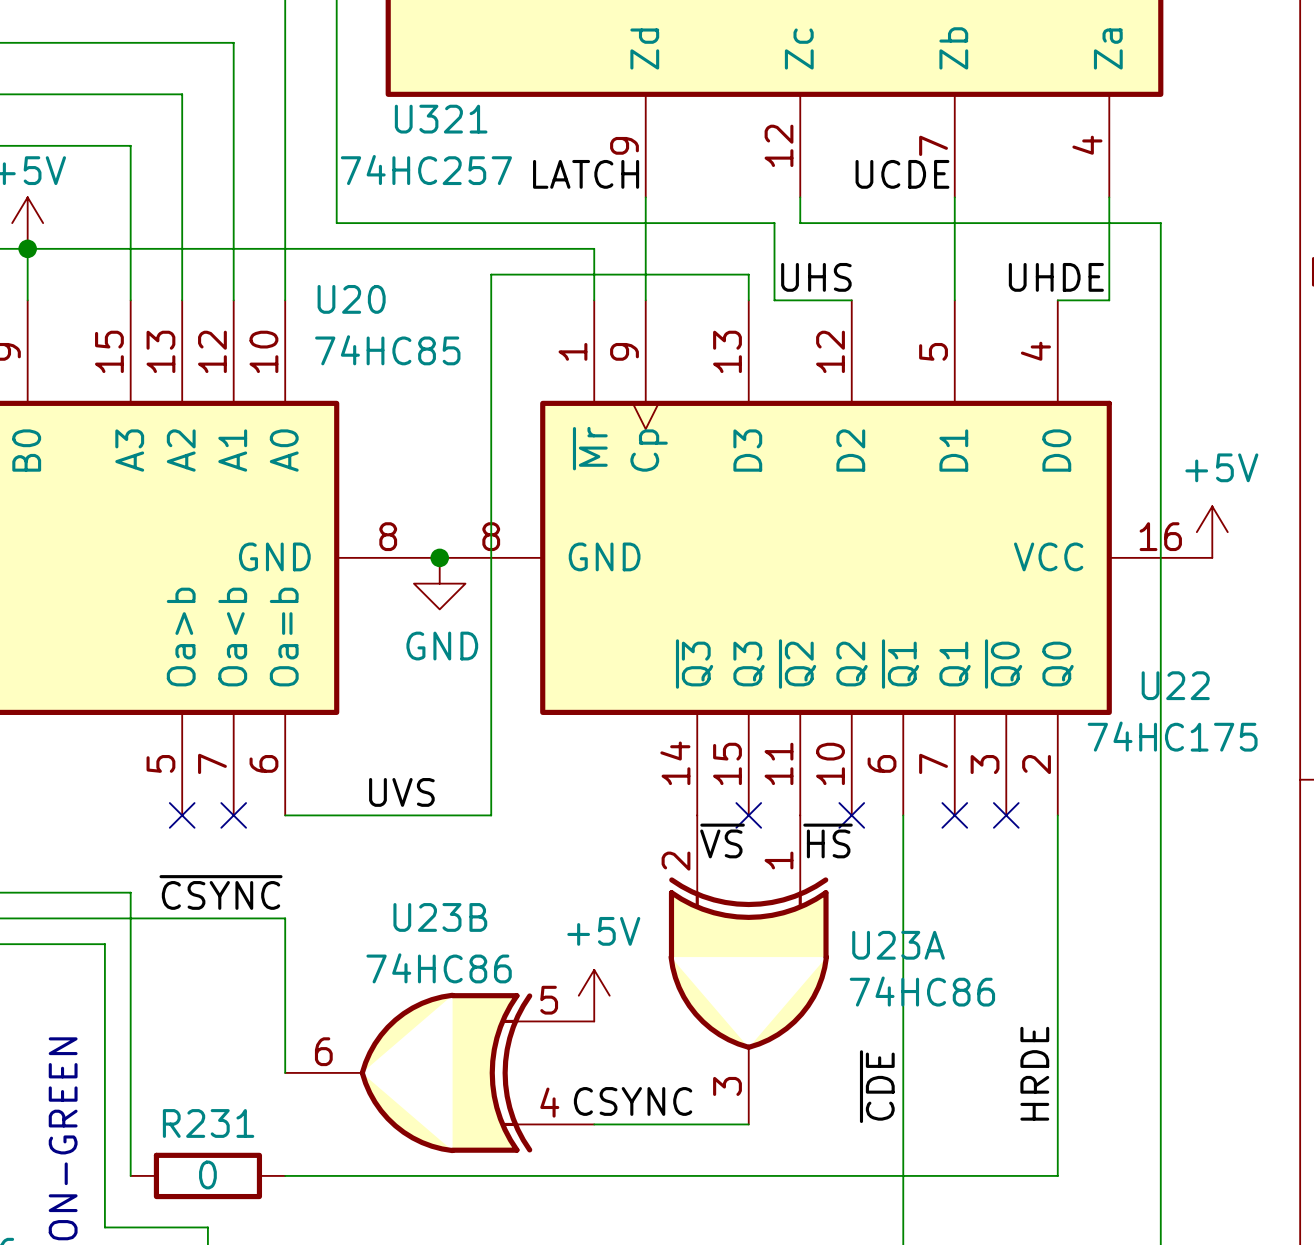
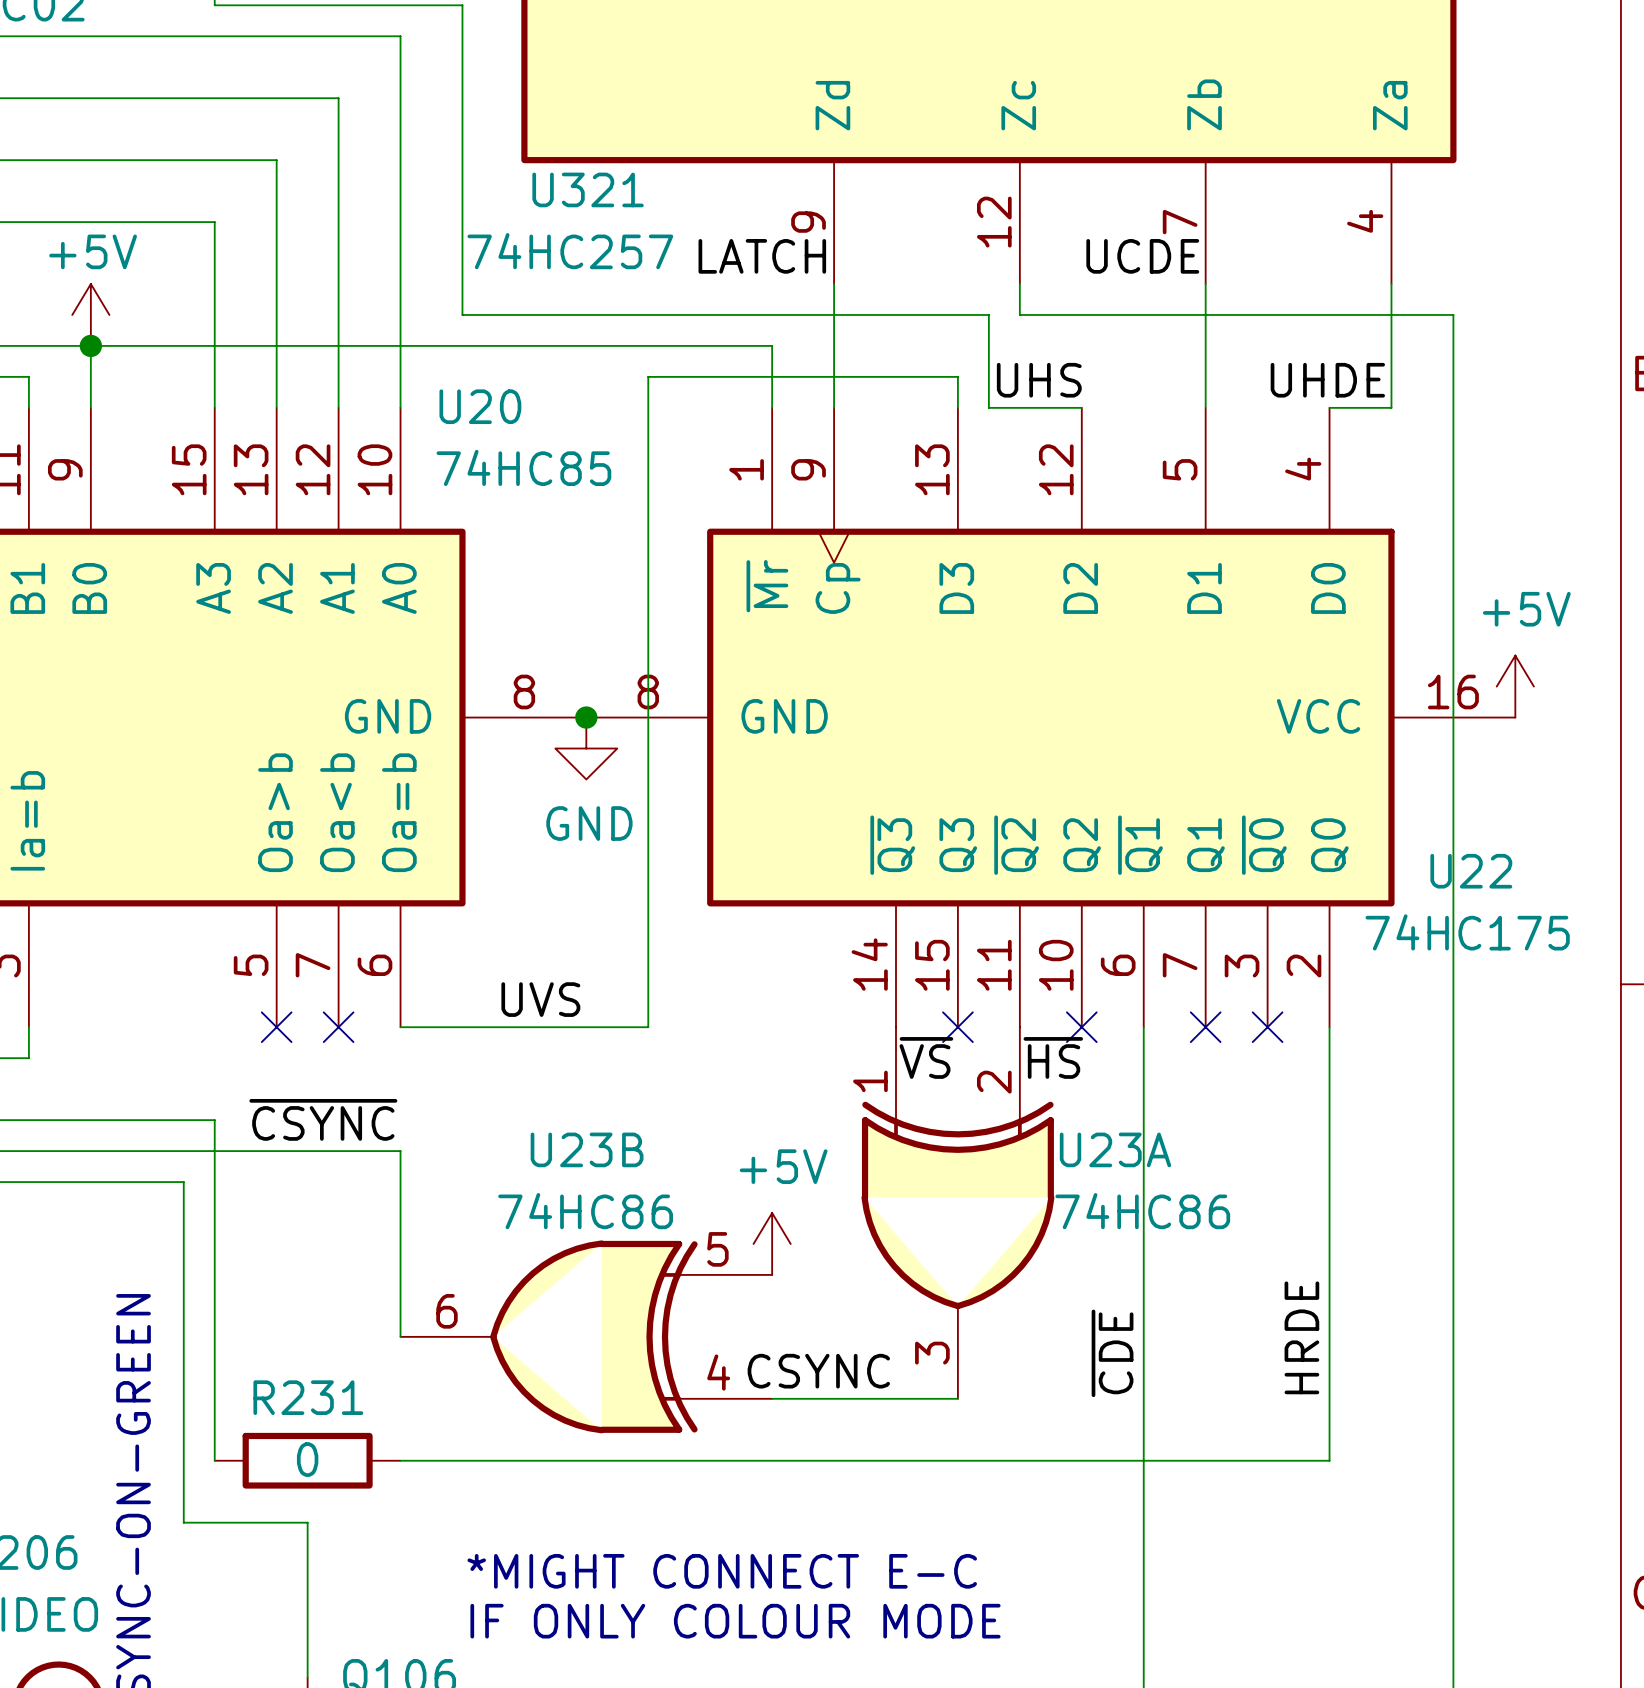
U23A name position: U23A (898, 945) -> U23A (1115, 1149)
U23A flip: as is (748, 963) -> left-right (957, 1205)
U23A value position: 74HC86 (922, 991) -> 74HC86 (1142, 1211)

